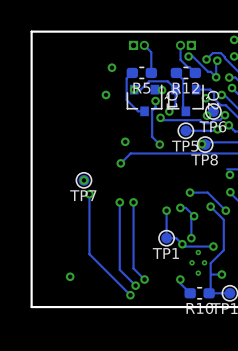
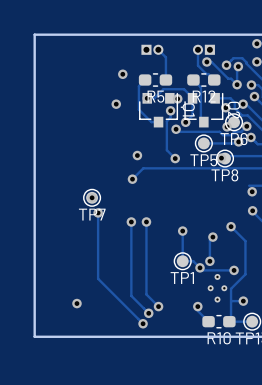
track: (190, 192) (207, 192) (225, 210) -> none
via: (190, 192) -> none
track: (180, 207) (185, 207) (194, 216) -> none
via: (180, 207) -> none
via: (225, 210) -> none

